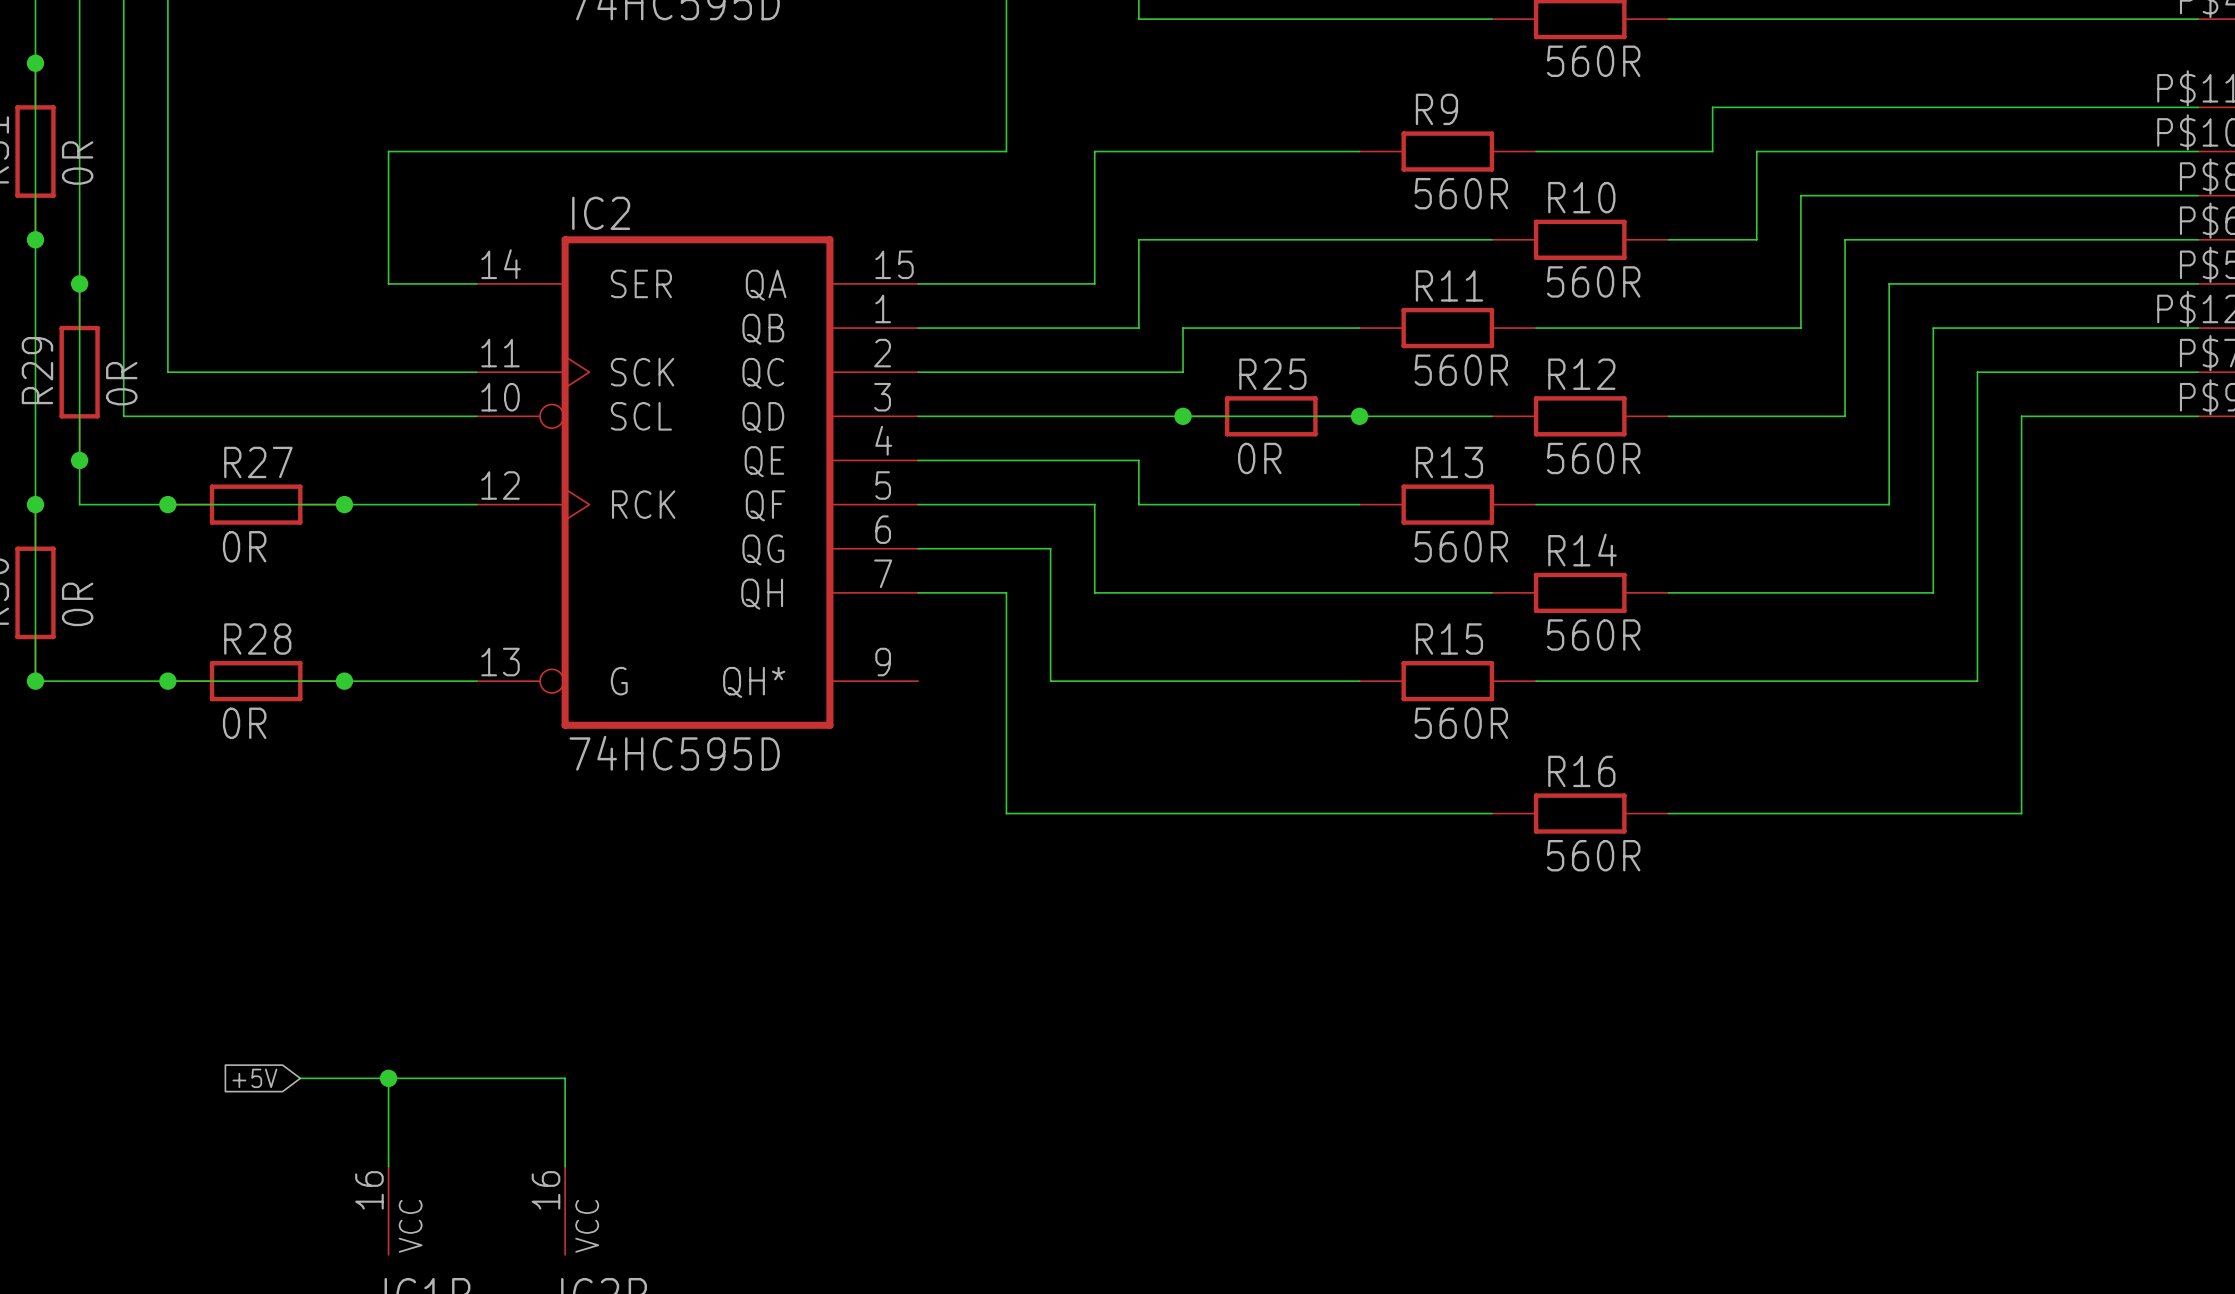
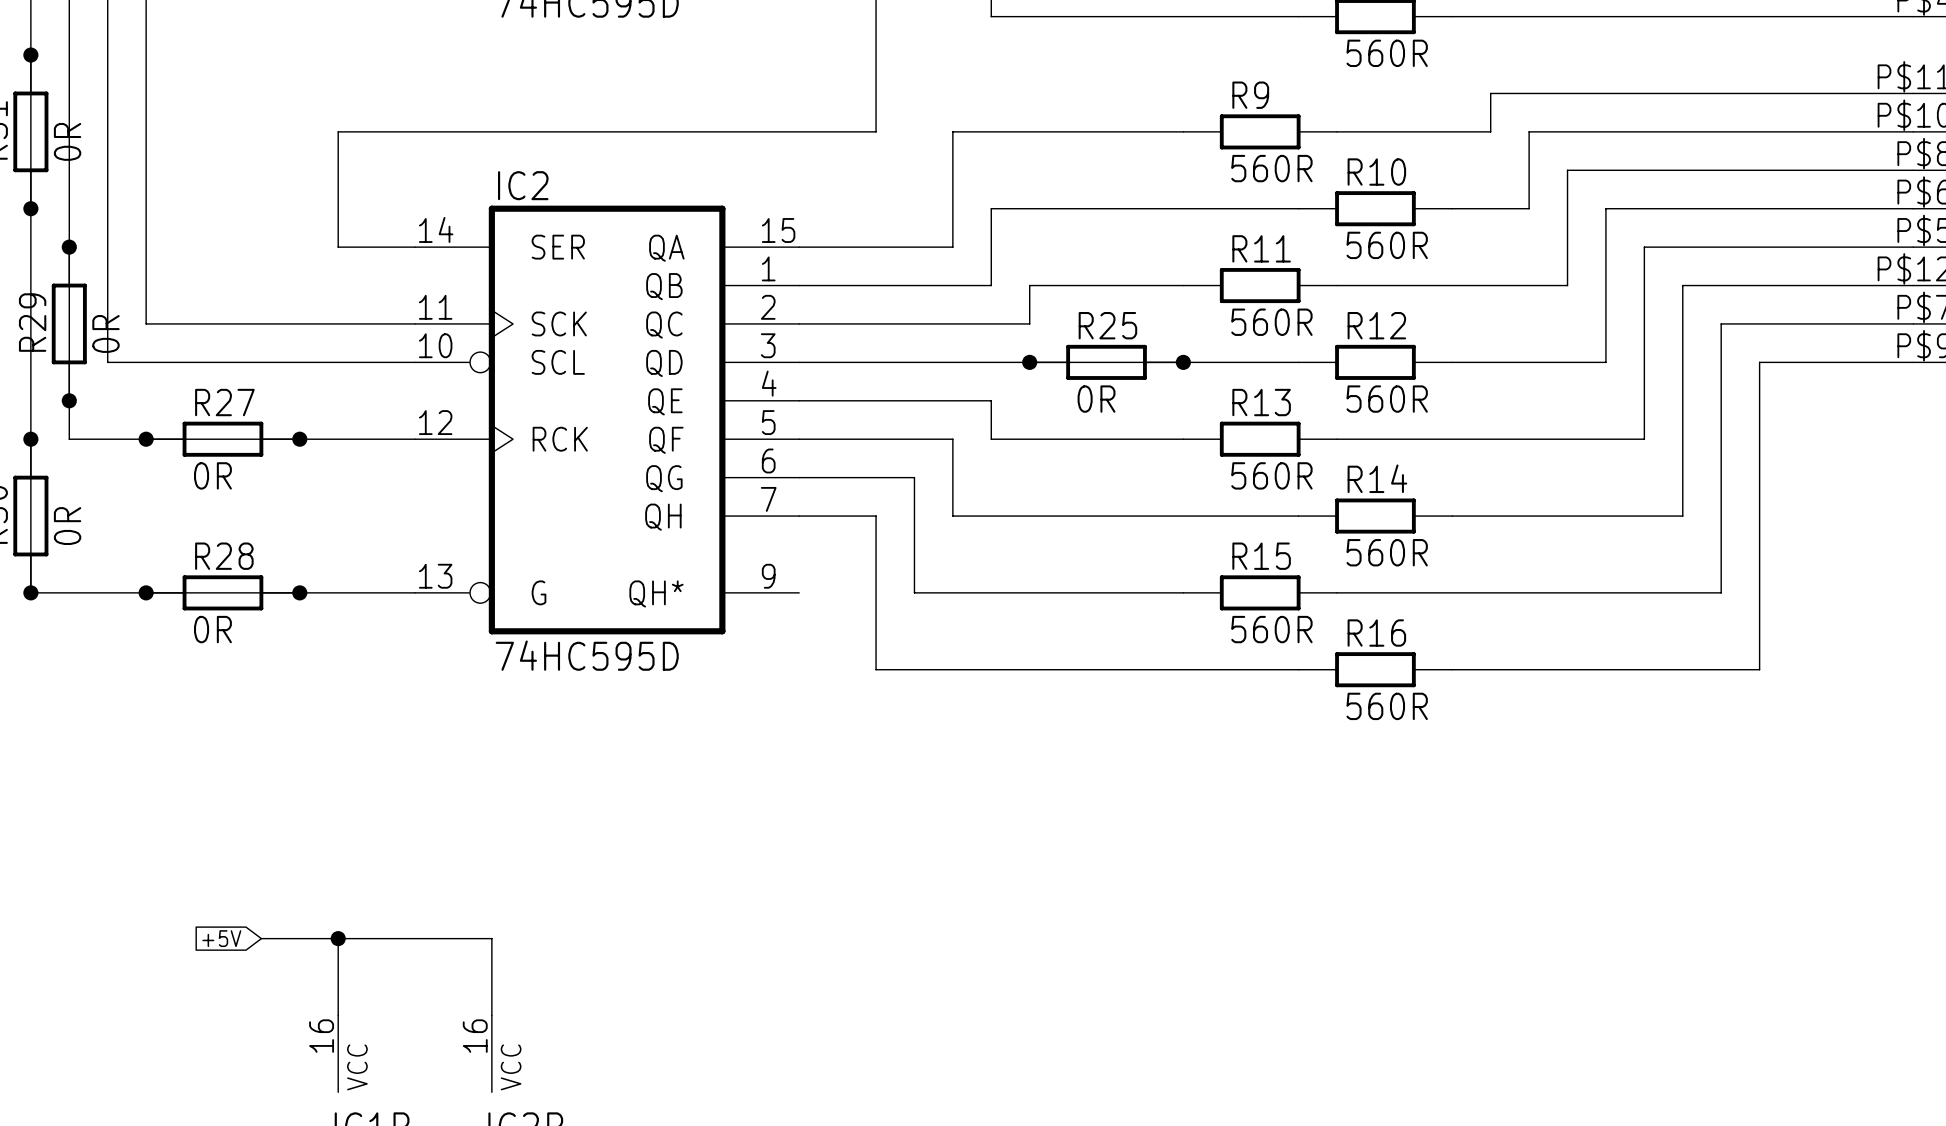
wire: (1006, 769) (1006, 813) (1491, 813) -> (876, 669) (1298, 669)
wire: (2021, 769) (2021, 813) (1668, 813) -> (1759, 669) (1452, 669)
R16 position: (1580, 813) -> (1375, 669)

